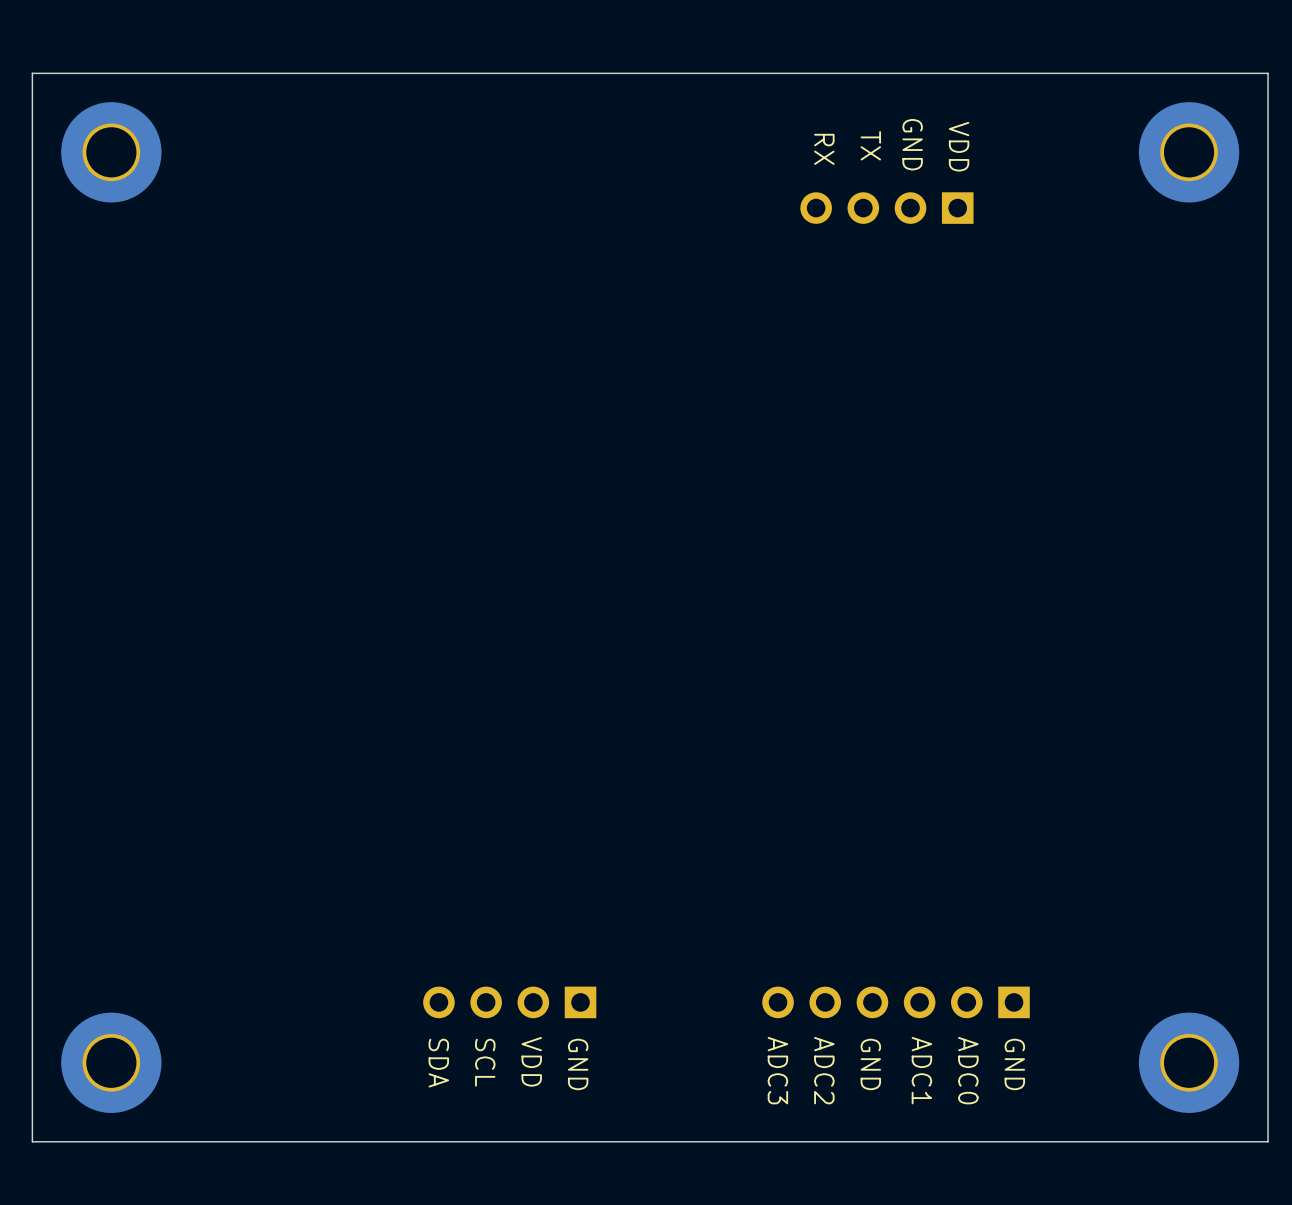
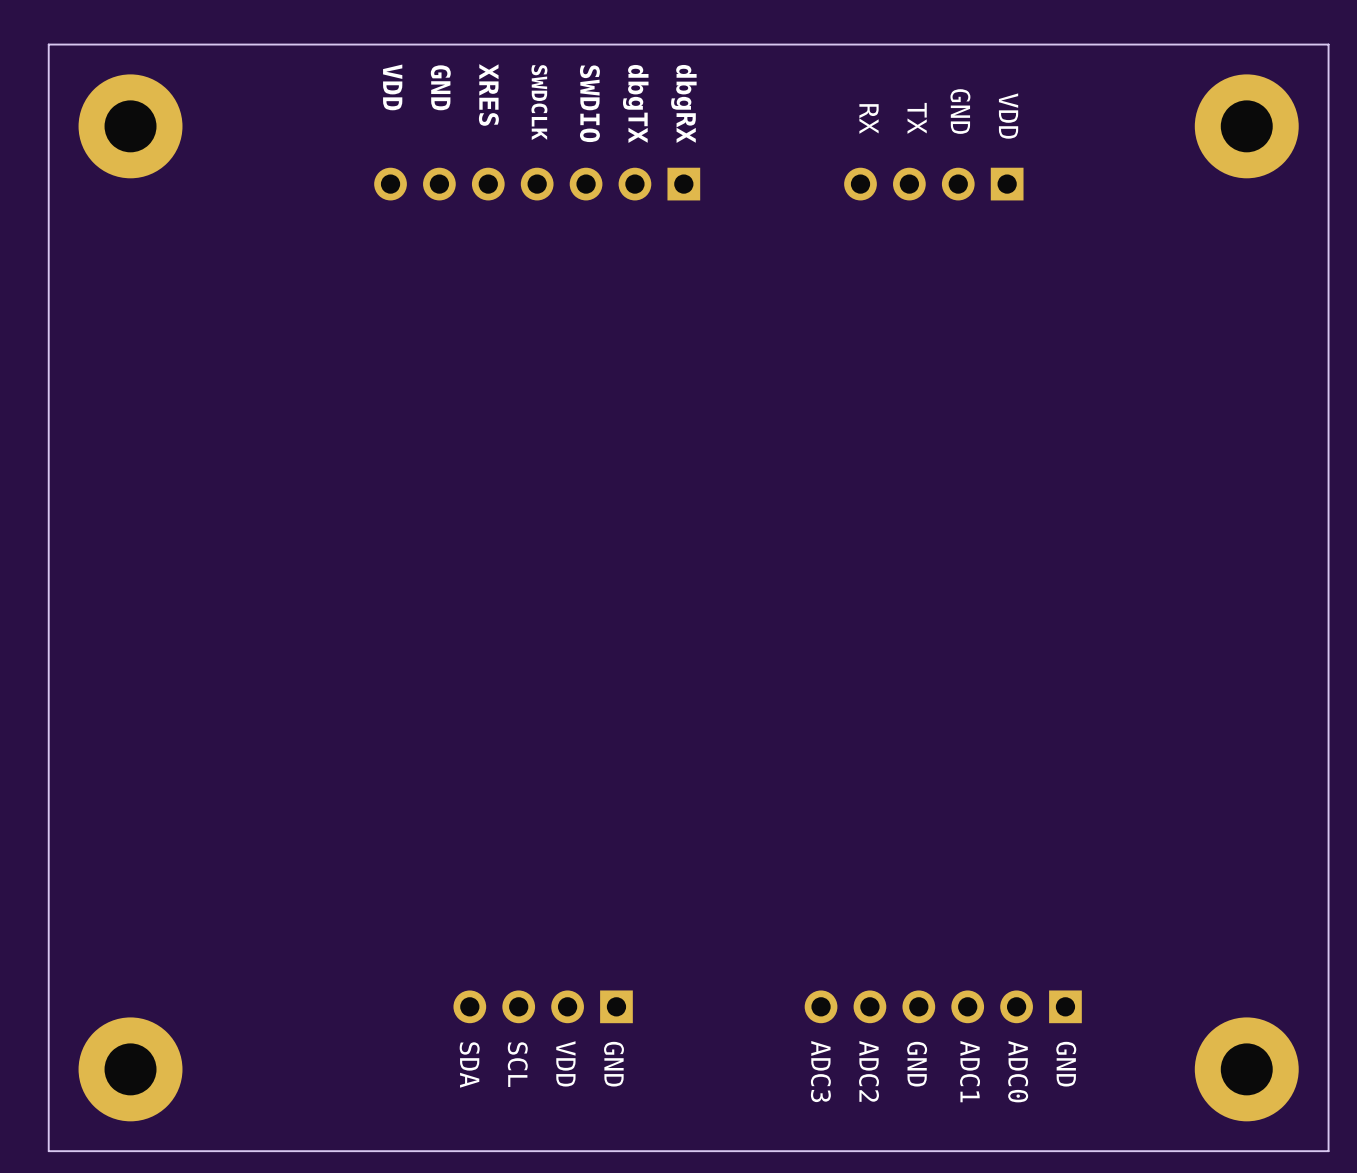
text: none -> VDD (392, 87)
text: none -> GND (440, 87)
text: none -> XRES (488, 94)
text: none -> dbgTX (635, 103)
text: none -> SWDIO (589, 103)
text: none -> SWDCLK (539, 102)
text: none -> dbgRX (683, 103)
part: none -> (537, 184)

